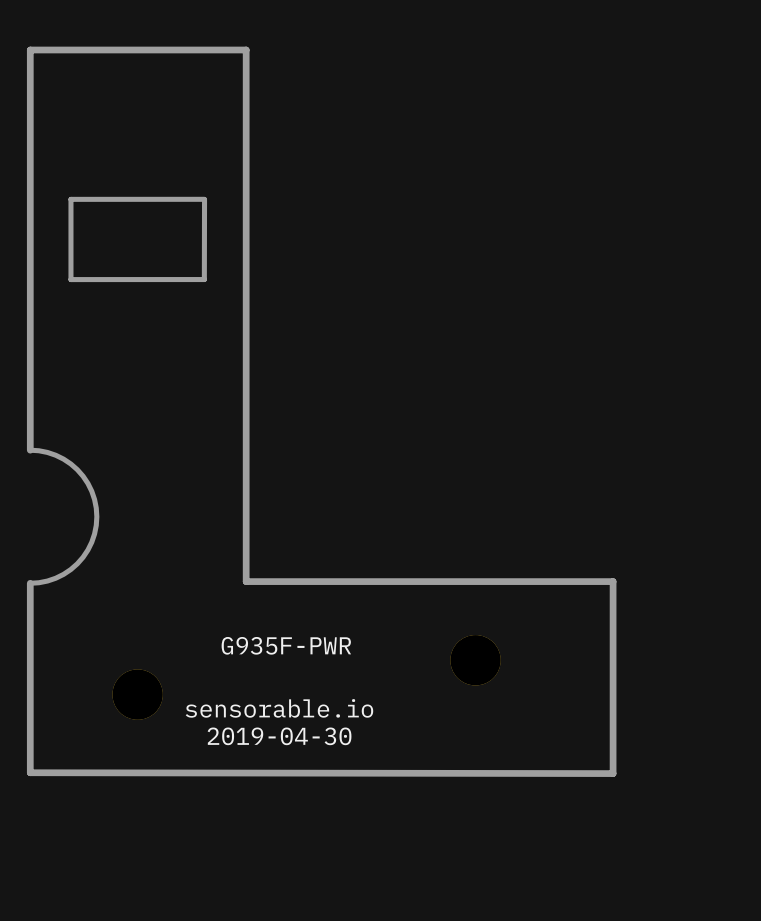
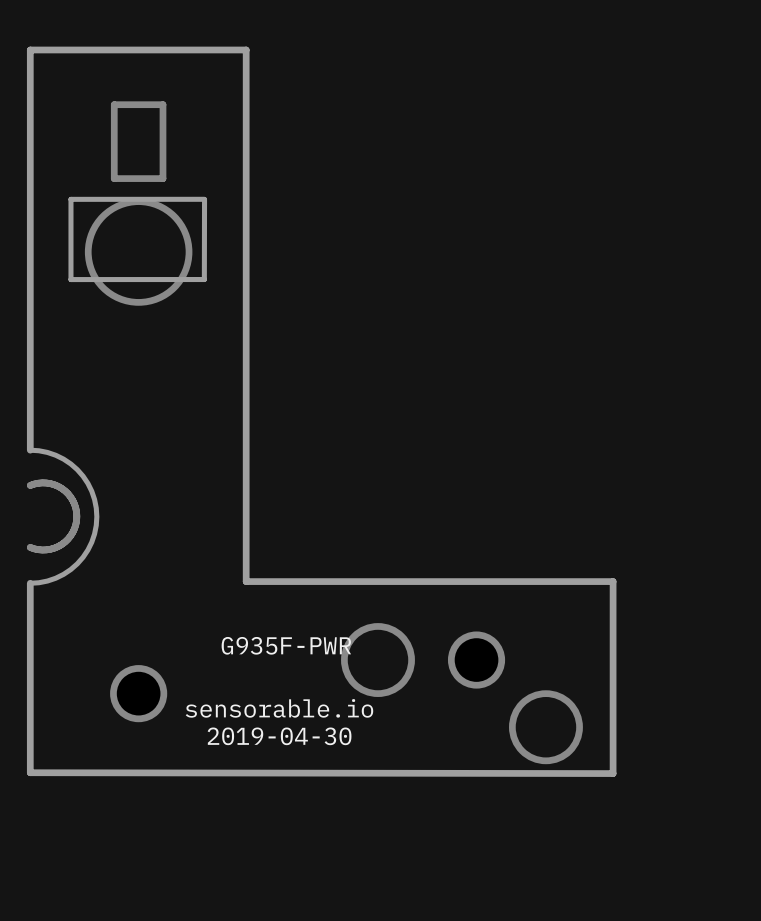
line: none -> (114, 104) (162, 104) (162, 178) (114, 178) (114, 104)
drawing: none -> [84, 198, 193, 306]
line: none -> (30, 485) (42, 482) (54, 484) (65, 490) (74, 504) (76, 520) (72, 532) (65, 541) (54, 548) (42, 550) (30, 547) (38, 549) (42, 550) (46, 549) (54, 548) (58, 546) (65, 541) (70, 535) (72, 532) (75, 524) (76, 520) (76, 516) (76, 512) (74, 504) (70, 497) (65, 490) (61, 488) (54, 484) (50, 483) (42, 482) (38, 483) (30, 485)
drawing: none -> [341, 623, 583, 765]
drawing: none -> [110, 665, 168, 723]

